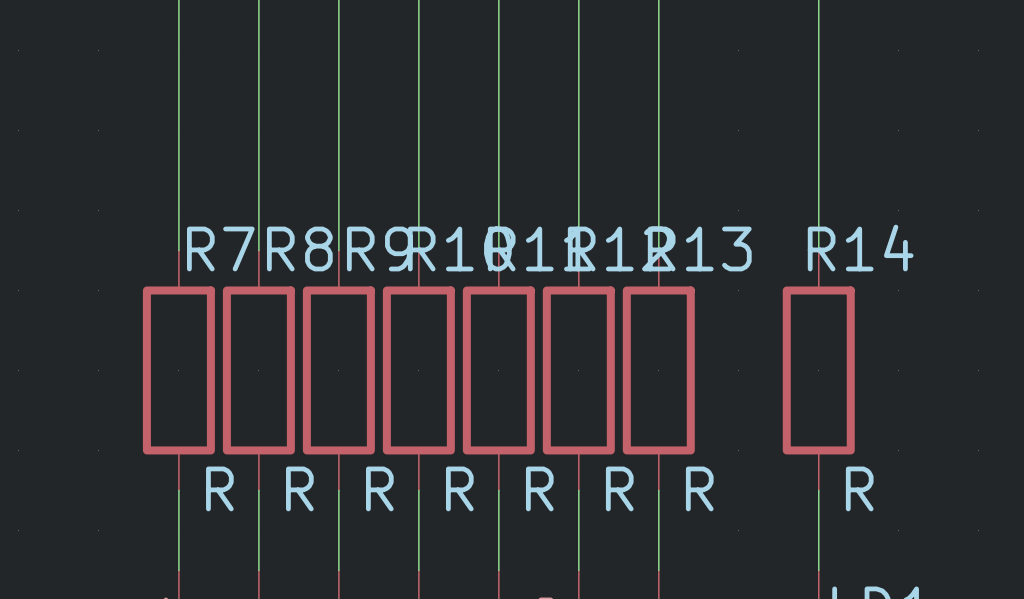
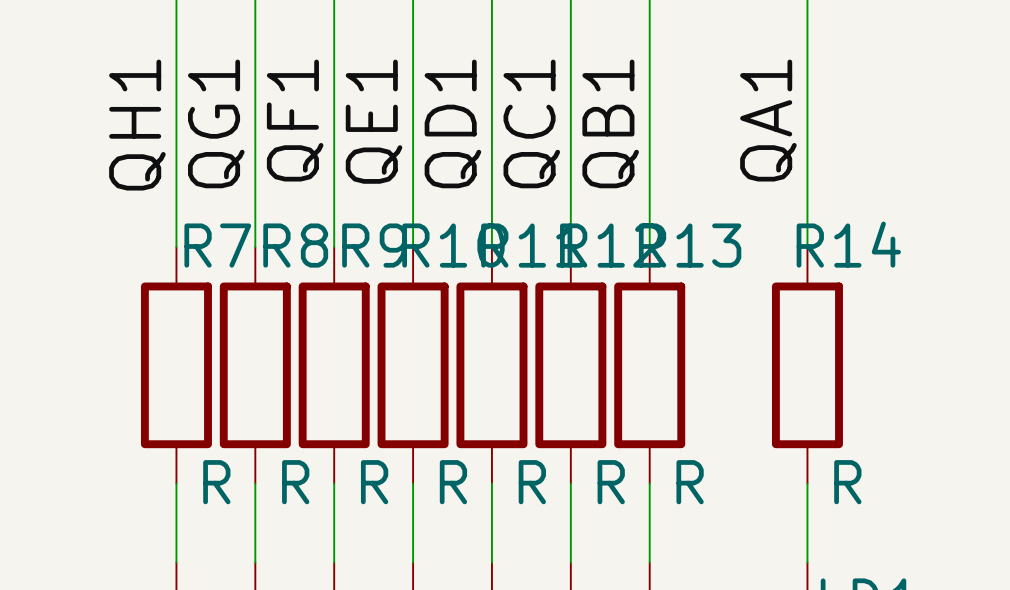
label: none -> QF1 (295, 120)
label: none -> QA1 (768, 120)
label: none -> QE1 (374, 121)
label: none -> QG1 (216, 123)
label: none -> QD1 (452, 123)
label: none -> QC1 (531, 123)
label: none -> QB1 (610, 123)
label: none -> QH1 (137, 125)

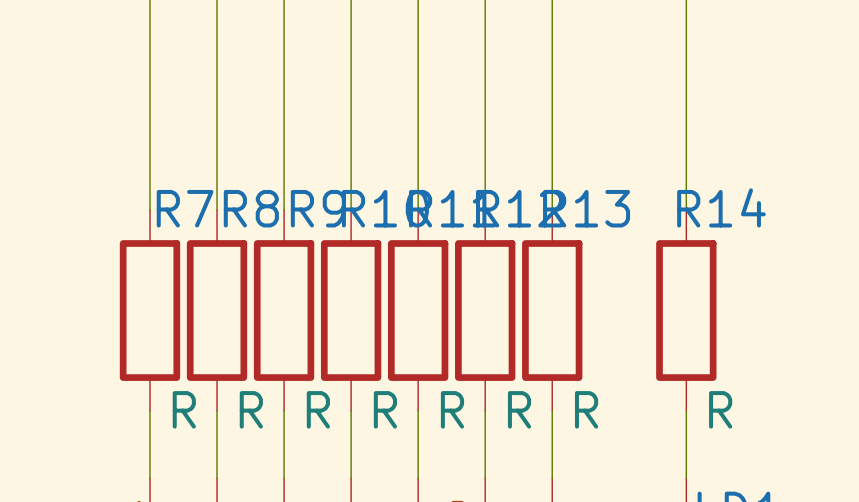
label: QF1 (295, 120) -> none
label: QA1 (768, 120) -> none
label: QE1 (374, 121) -> none
label: QG1 (216, 123) -> none
label: QD1 (452, 123) -> none
label: QC1 (531, 123) -> none
label: QB1 (610, 123) -> none
label: QH1 (137, 125) -> none

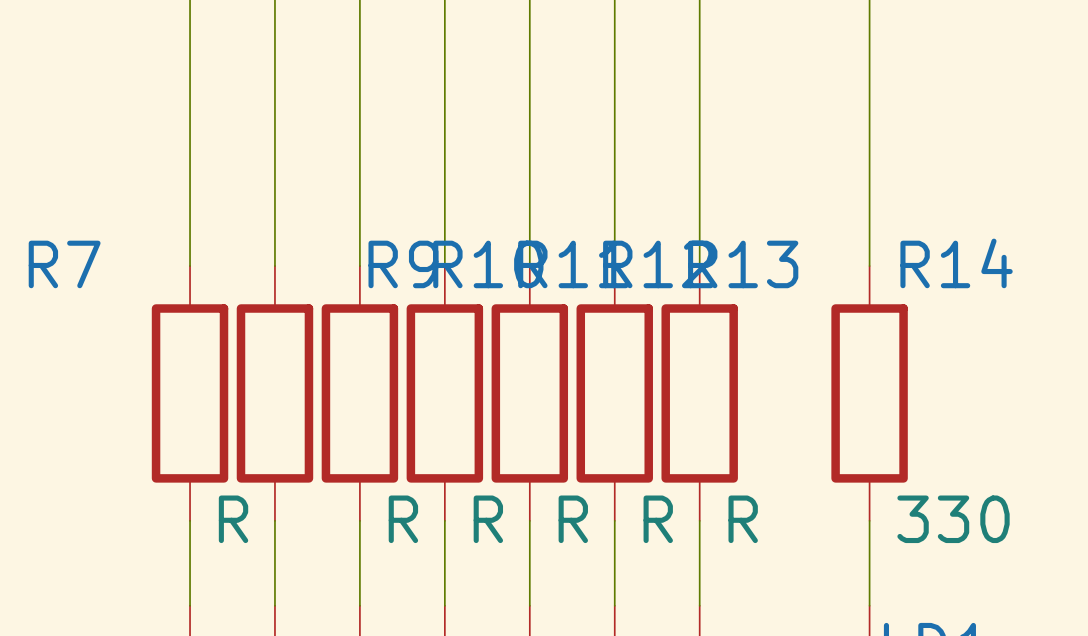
R14 name position: R14 (721, 207) -> R14 (956, 263)
R7 name position: R7 (185, 208) -> R7 (64, 264)
R8 name: R8 (251, 208) -> none
R8 value: R (251, 409) -> none
R14 value: R (720, 409) -> 330 (953, 519)

